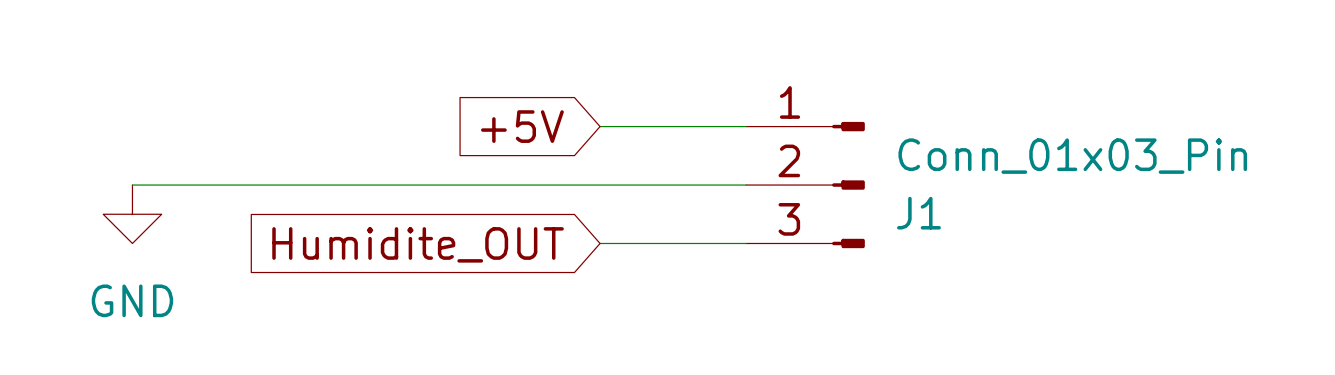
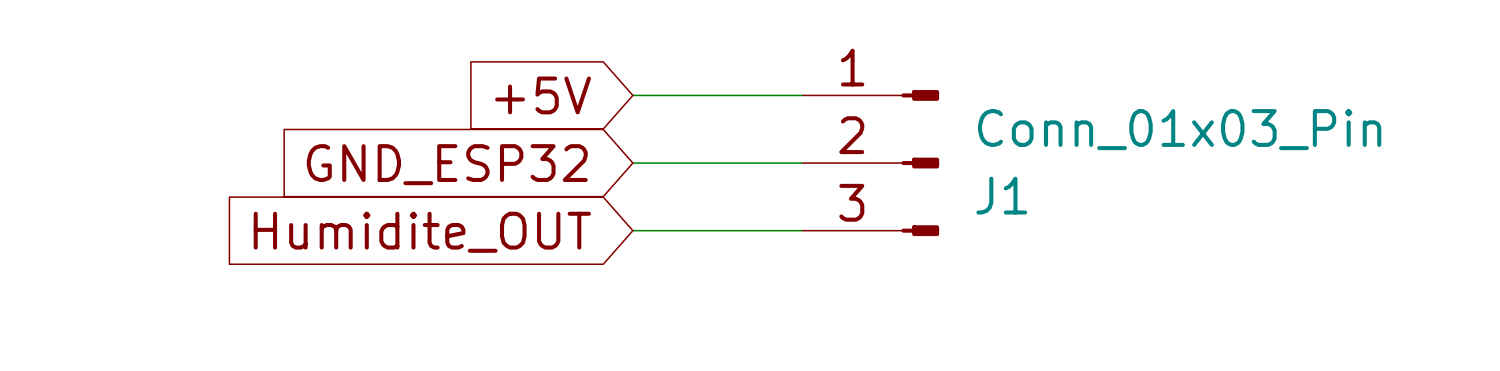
wire: (132, 185) (600, 185) -> none
global label: none -> GND_ESP32 (447, 164)
power symbol: GND (132, 214) -> none

